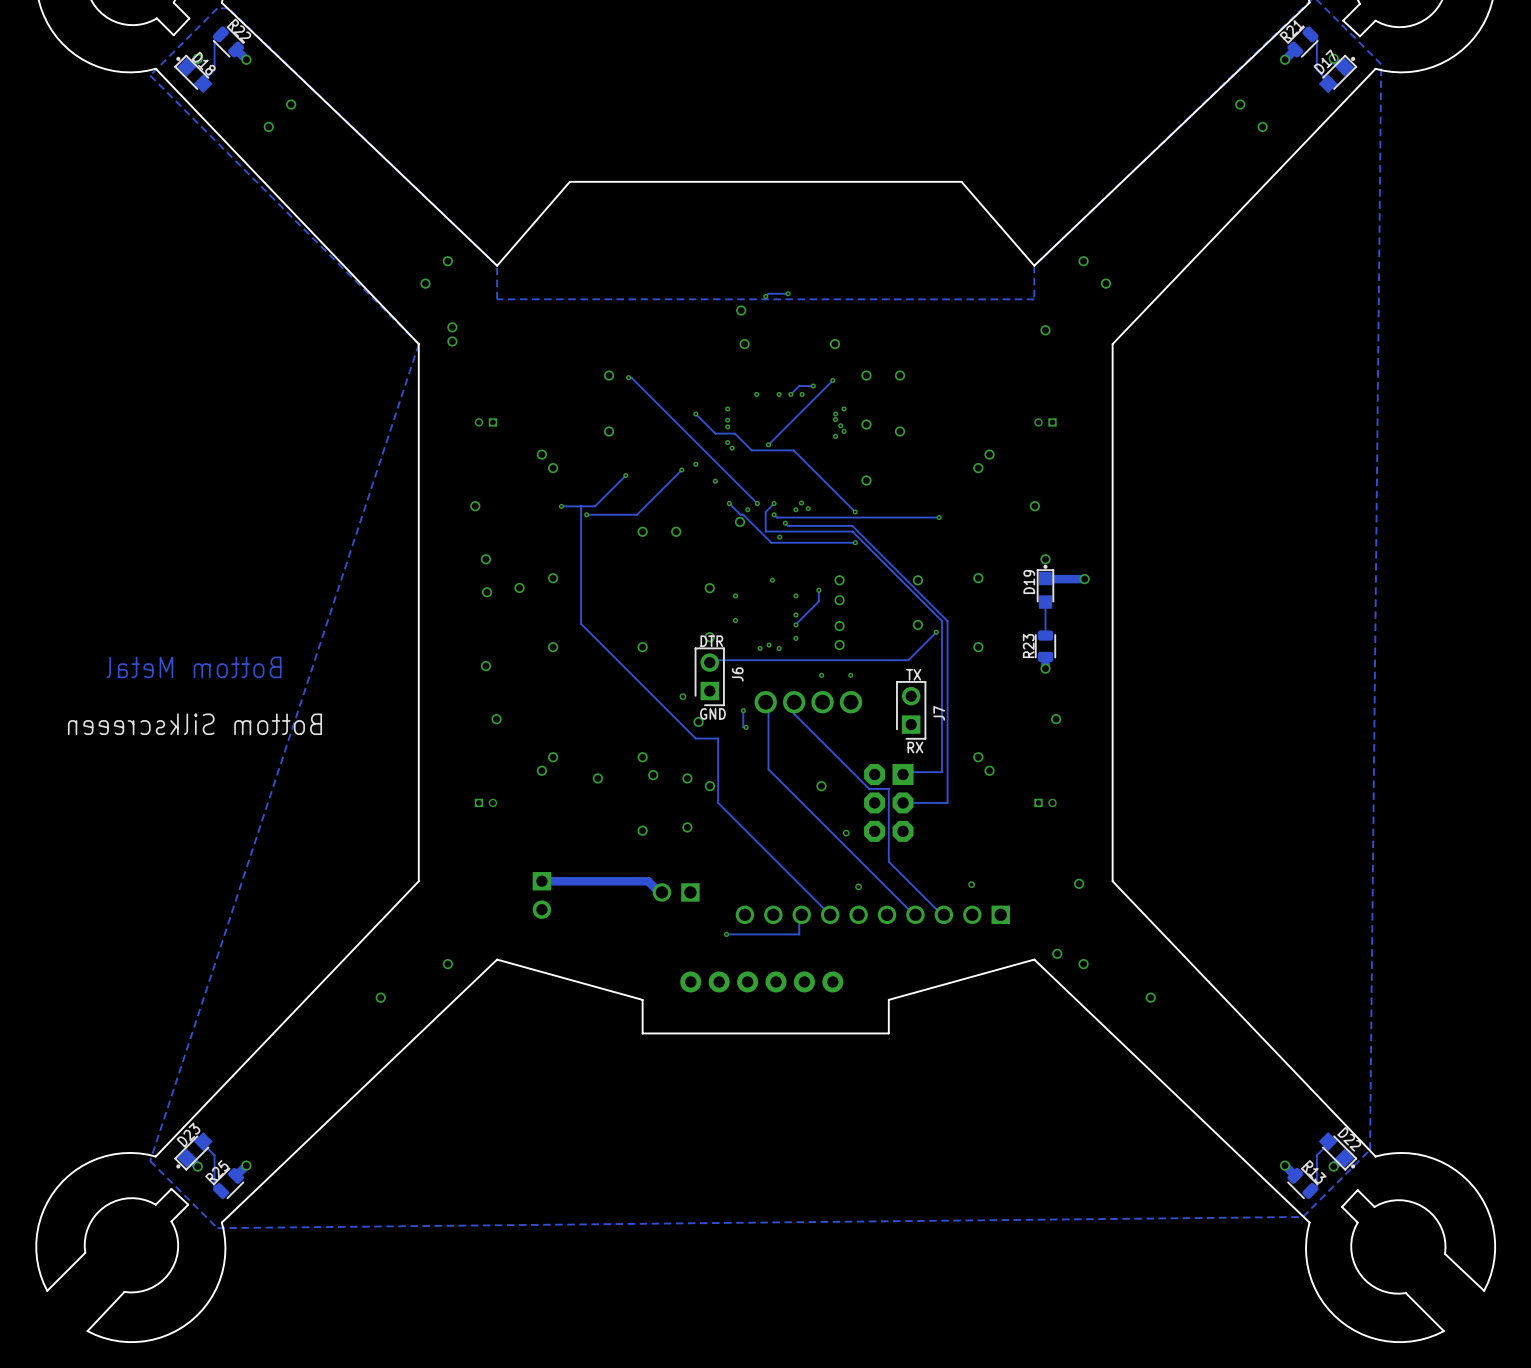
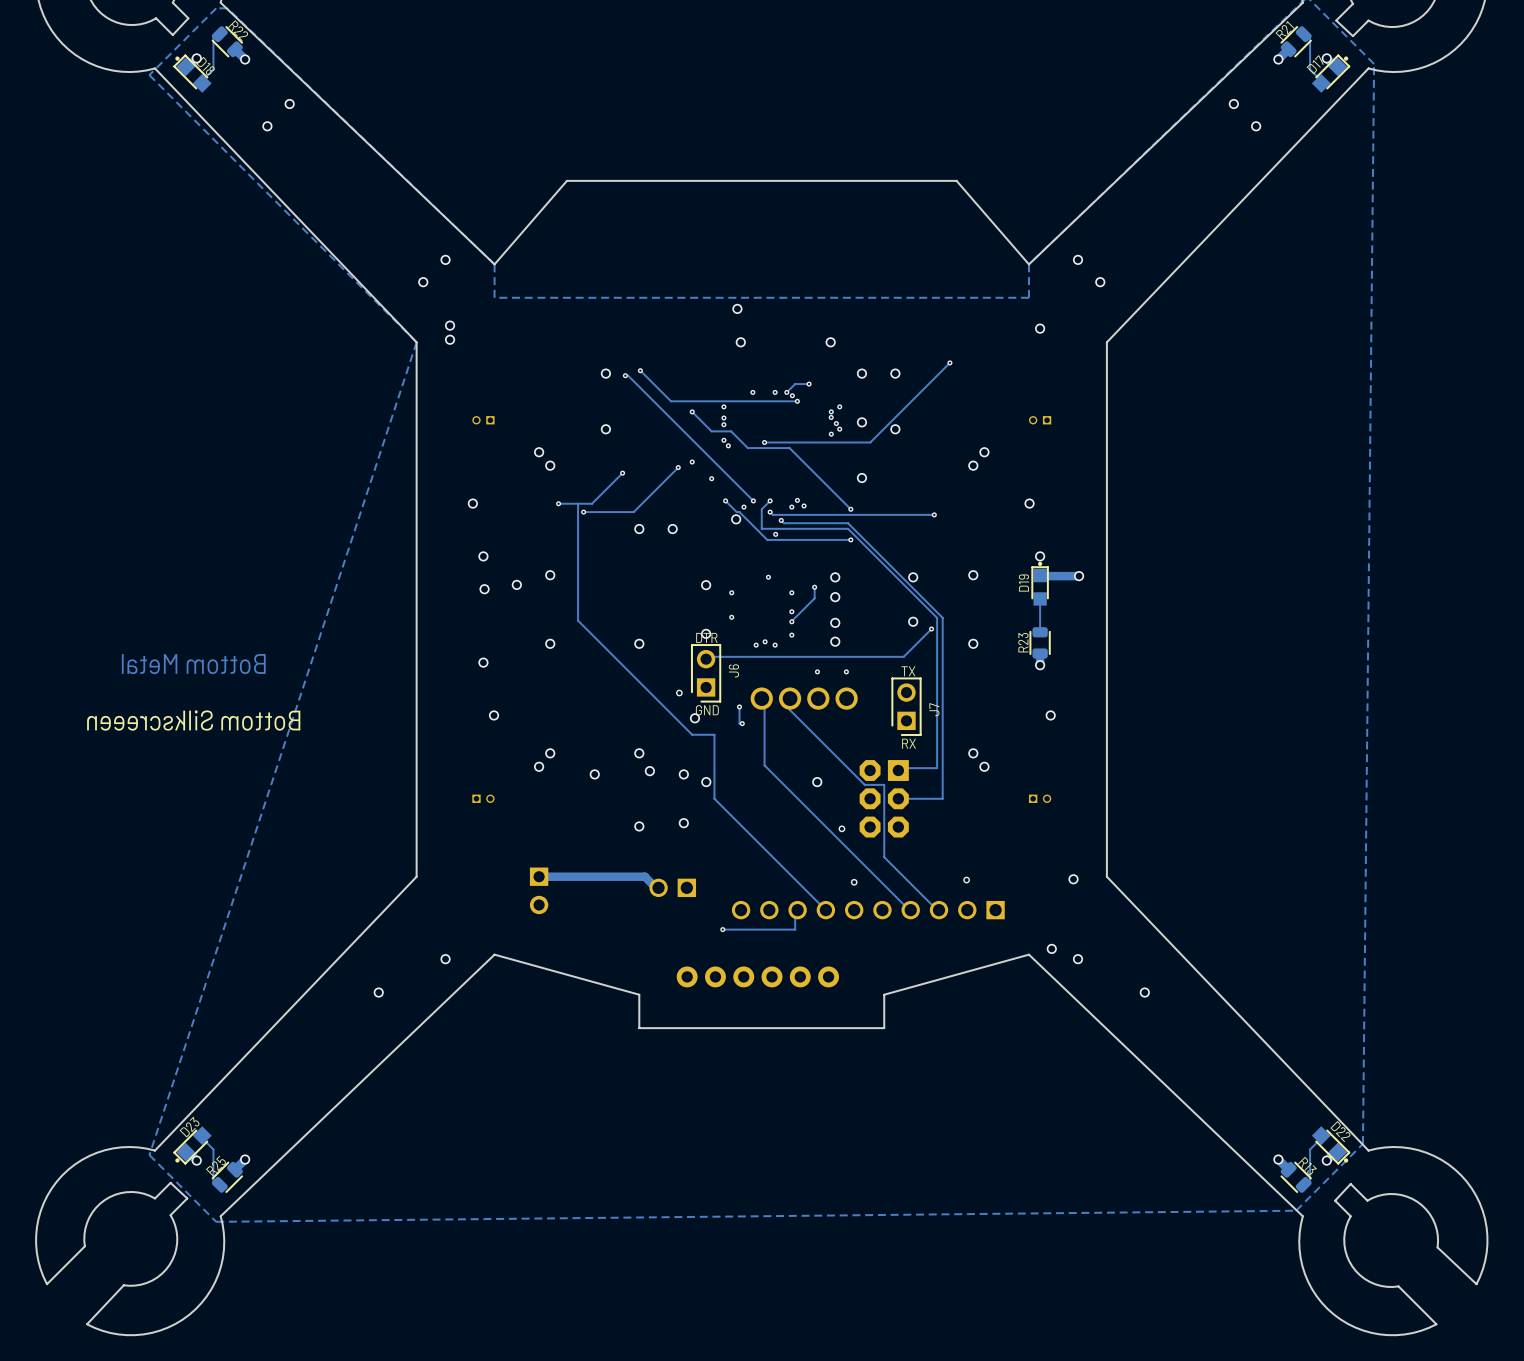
track: (788, 293) (768, 293) (765, 296) -> none
via: (788, 293) -> none
via: (765, 296) -> none
via: none -> (949, 362)
track: none -> (640, 370) (671, 401) (797, 401)
via: none -> (640, 370)
track: (832, 380) (768, 444) -> (949, 362) (870, 442) (764, 442)
via: (832, 380) -> none
via: (802, 394) -> none
via: none -> (792, 395)
via: none -> (797, 401)

